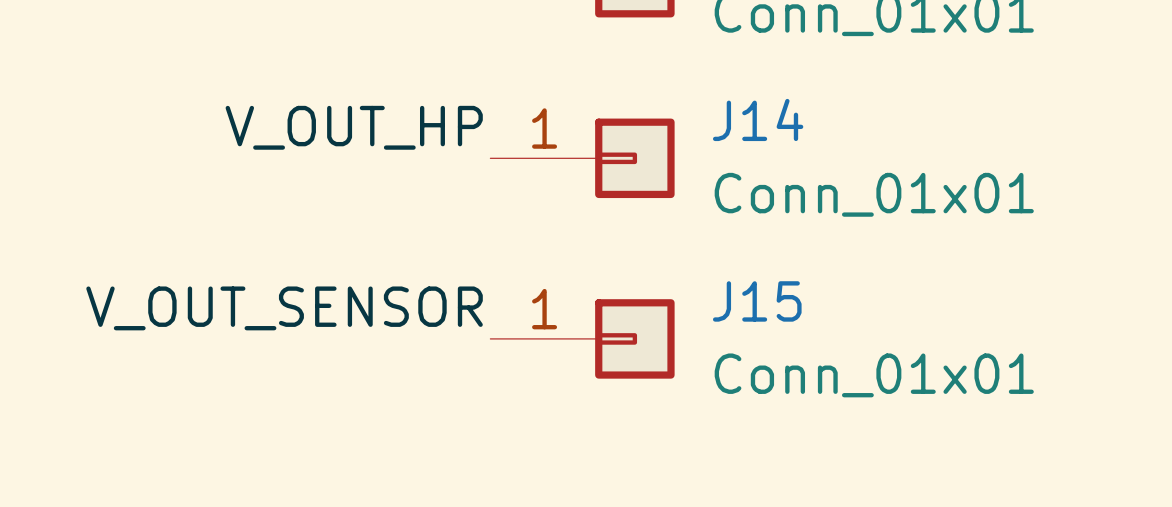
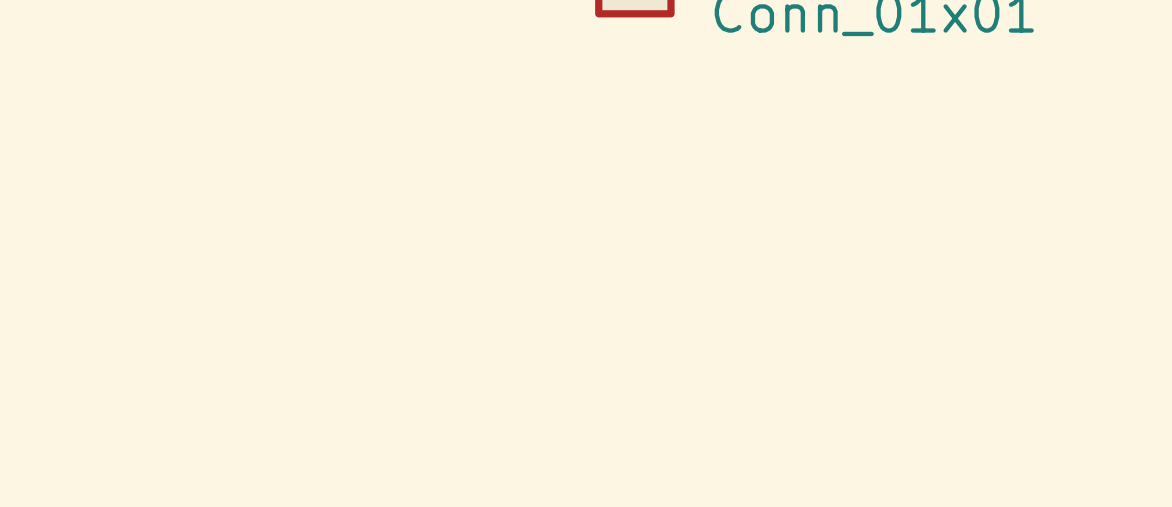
label: V_OUT_HP (354, 127) -> none
J14: Conn_01x01 (582, 158) -> none
label: V_OUT_SENSOR (284, 308) -> none
J15: Conn_01x01 (582, 338) -> none

